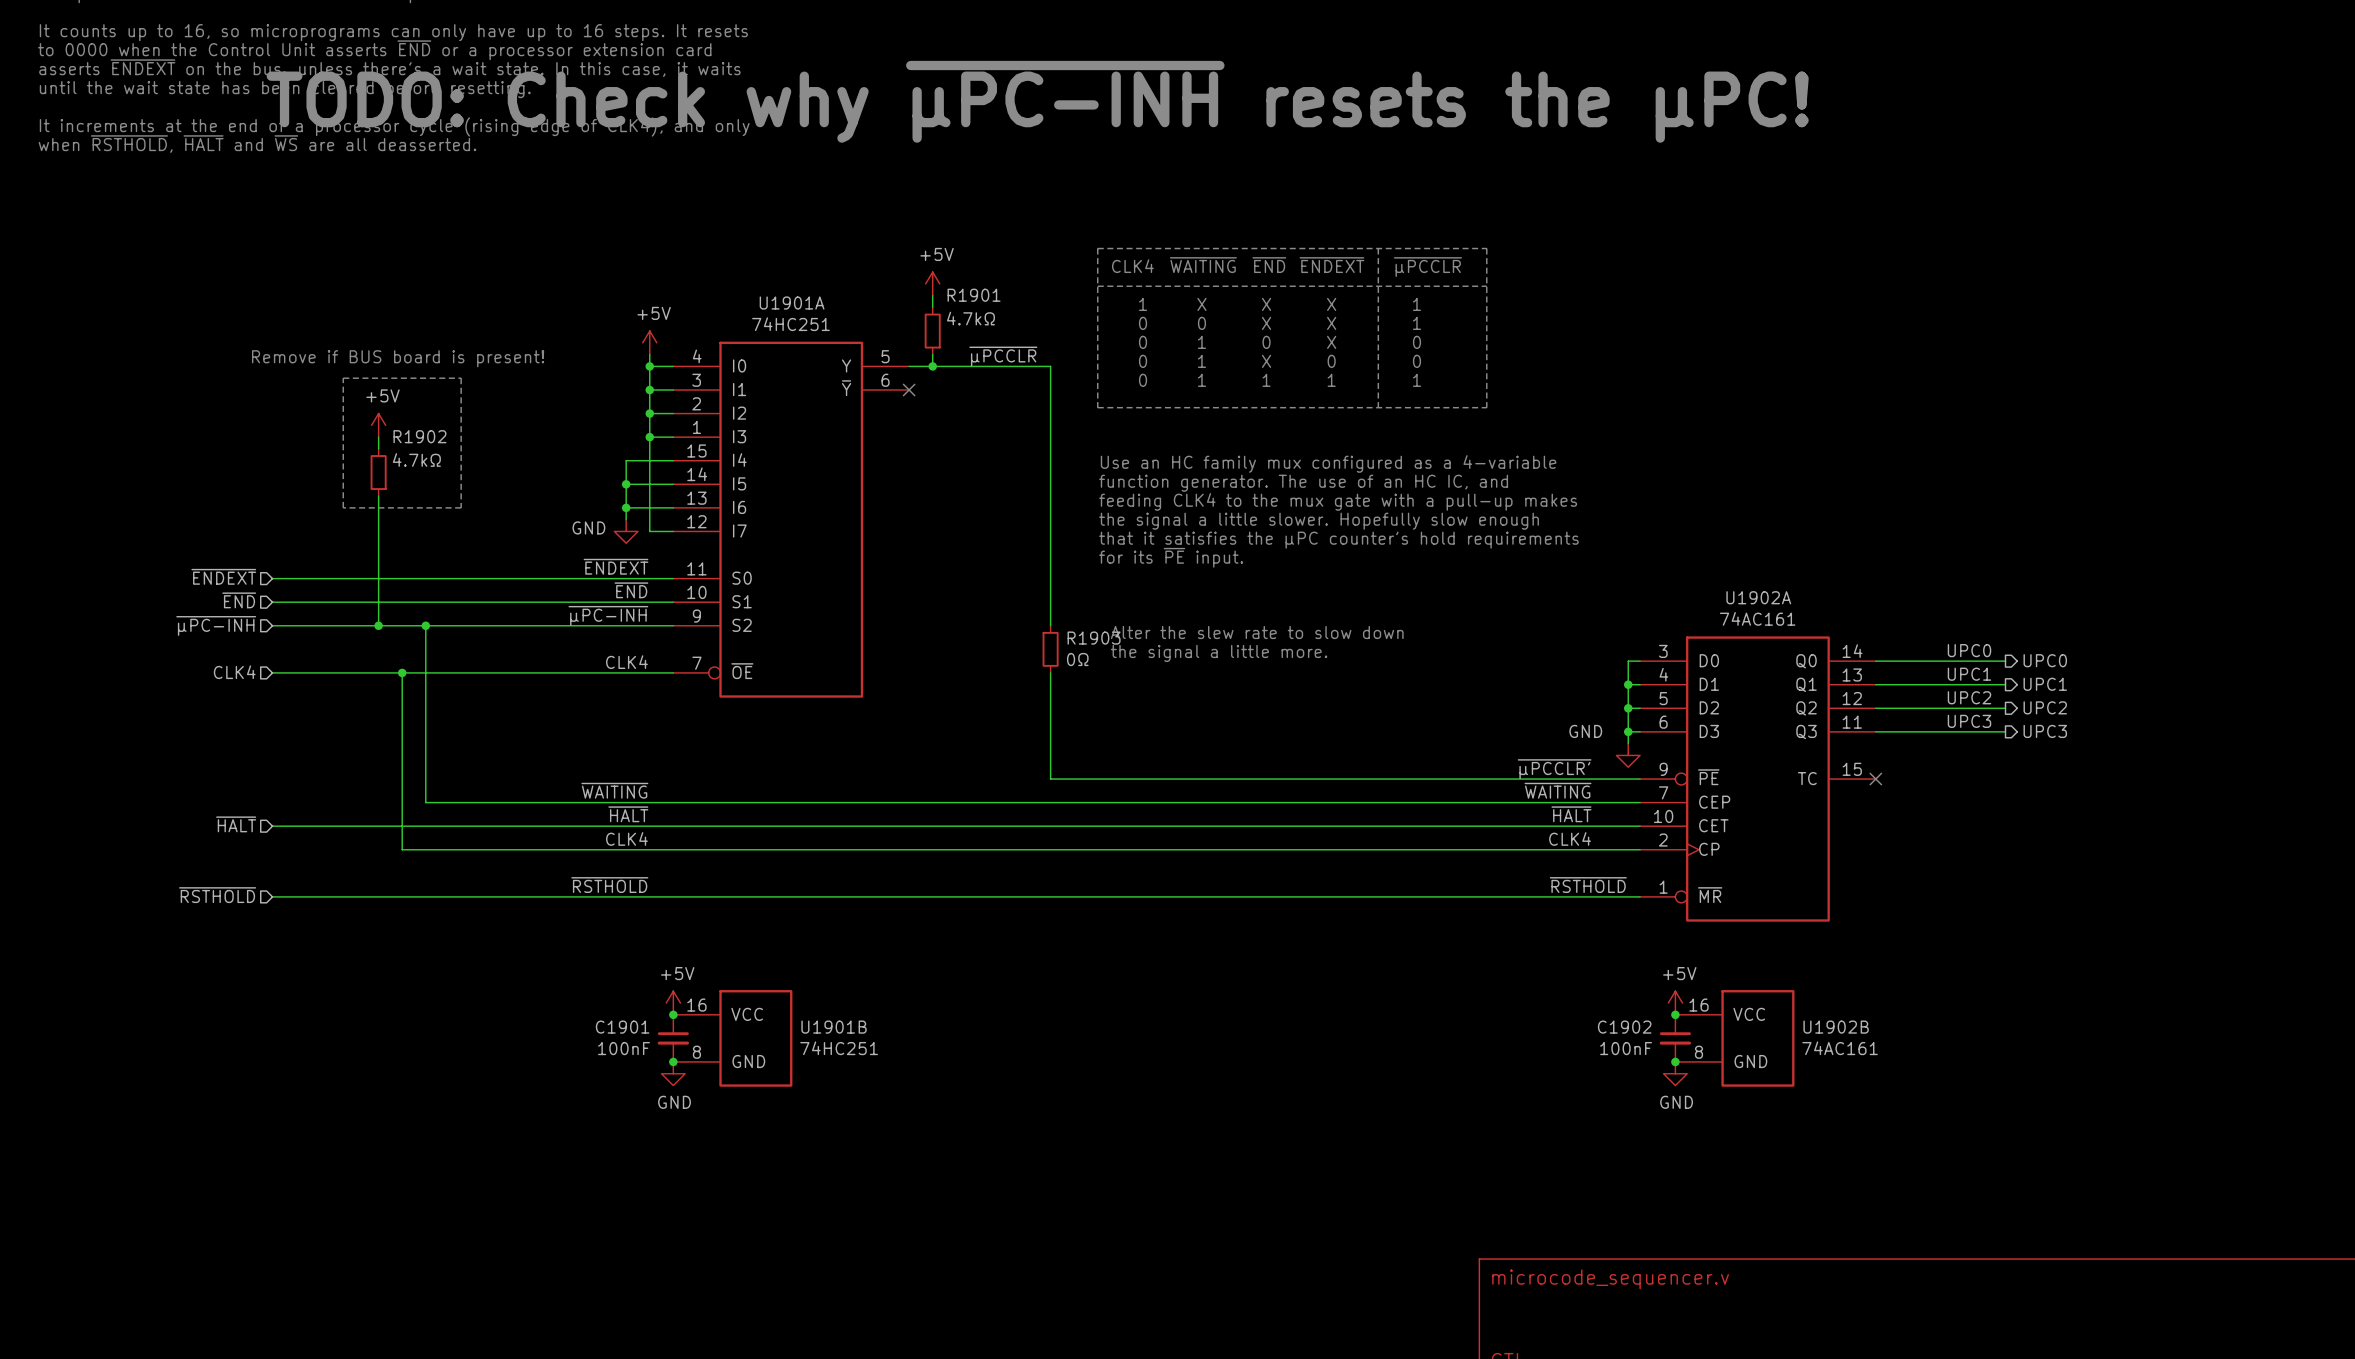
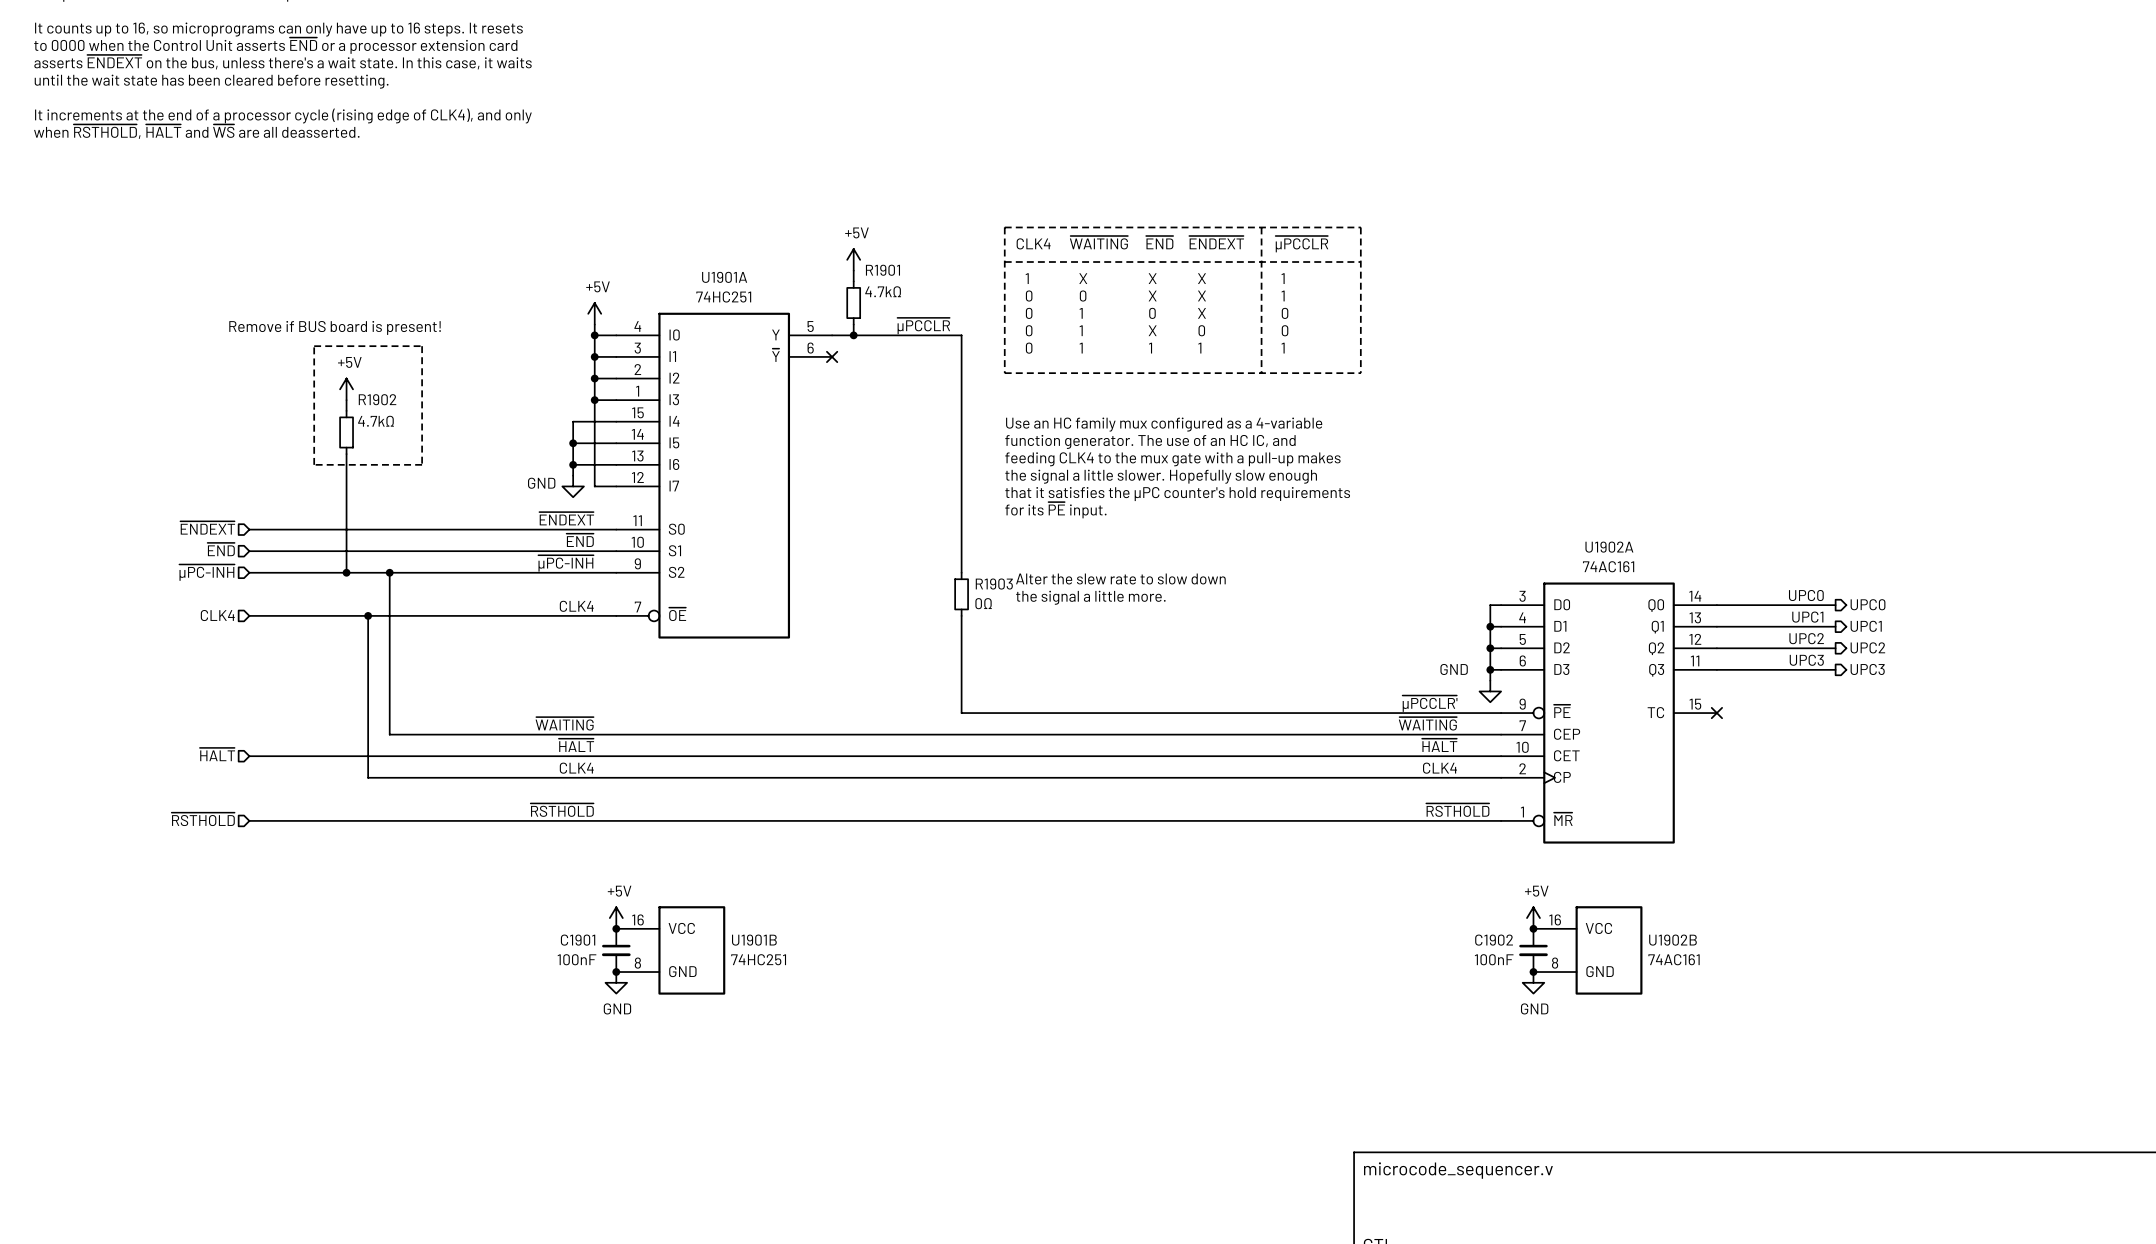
text: TODO: Check why ~{µPC-INH} resets the µPC! (1037, 101) -> none

